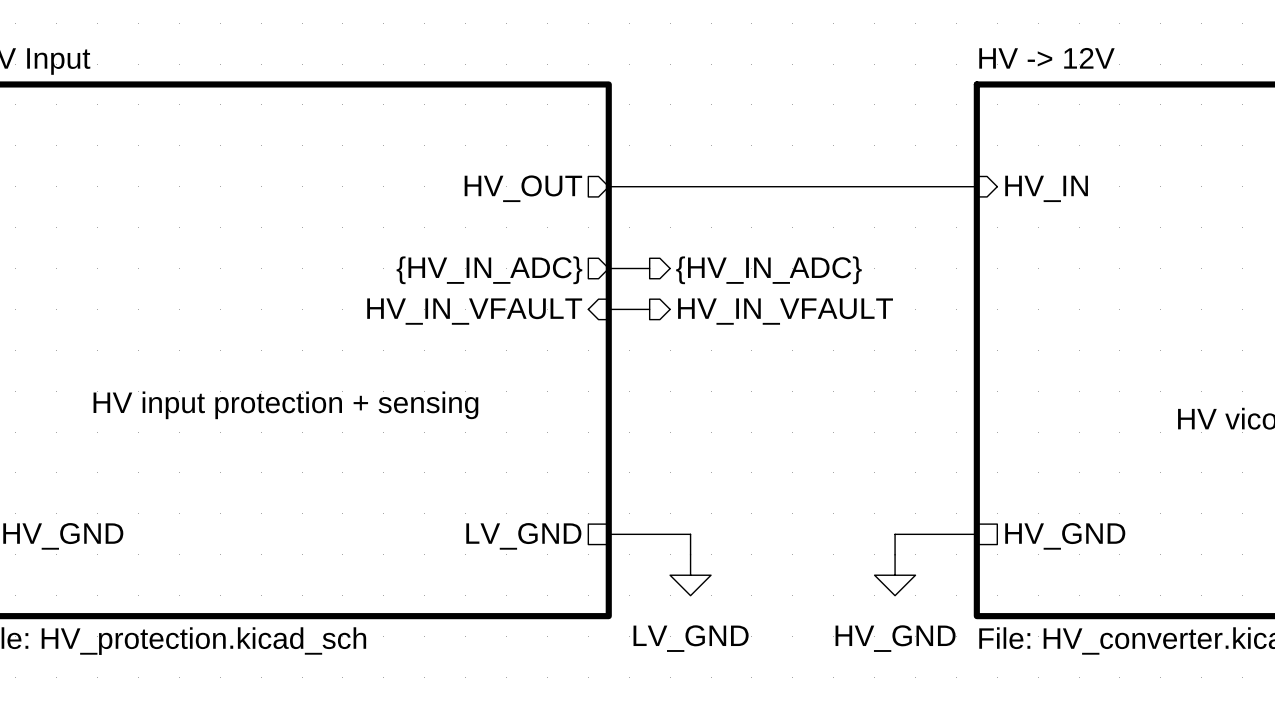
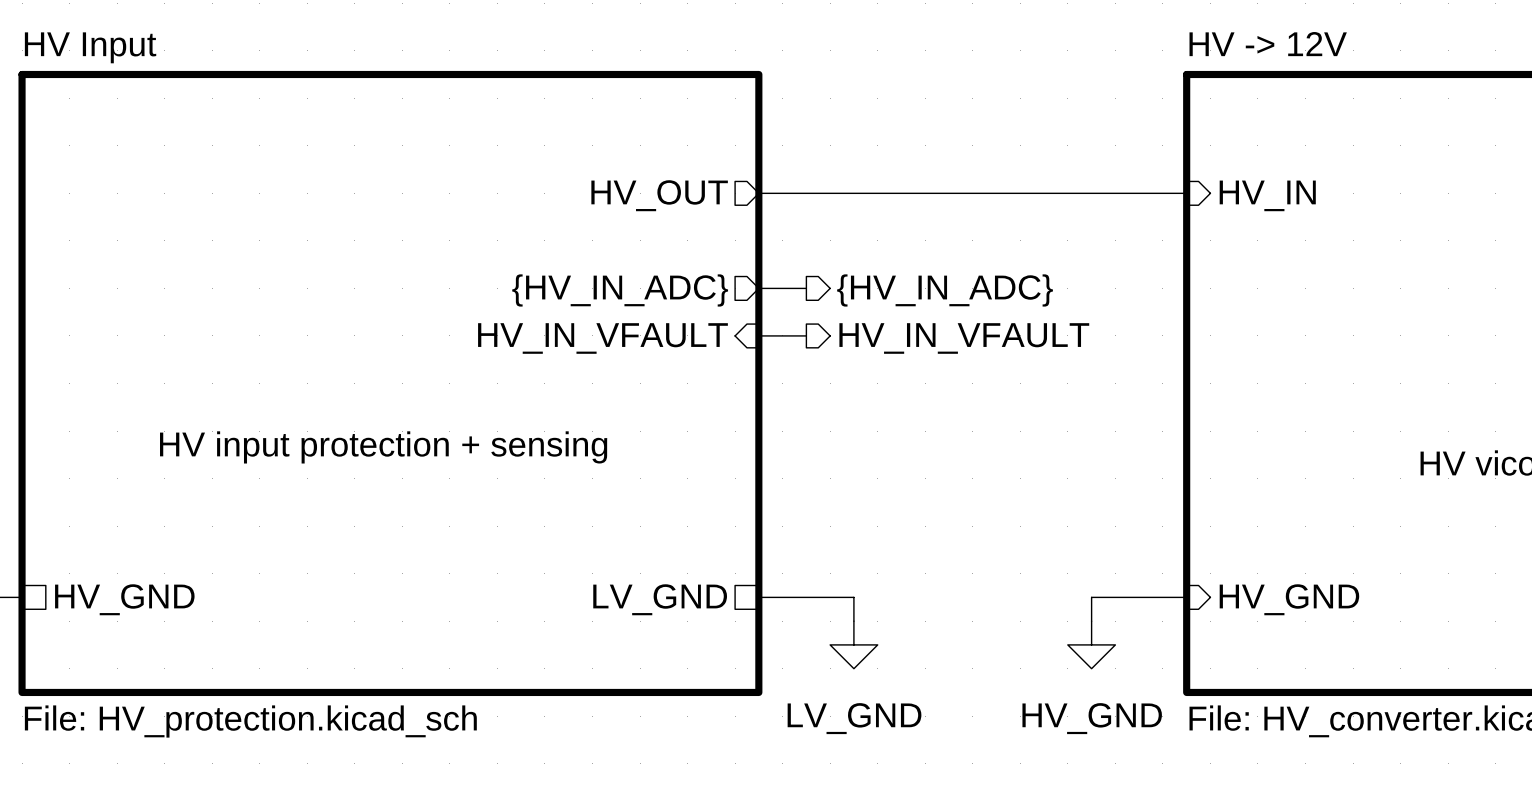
sheet pin shape: passive (1065, 536) -> input (1289, 599)

